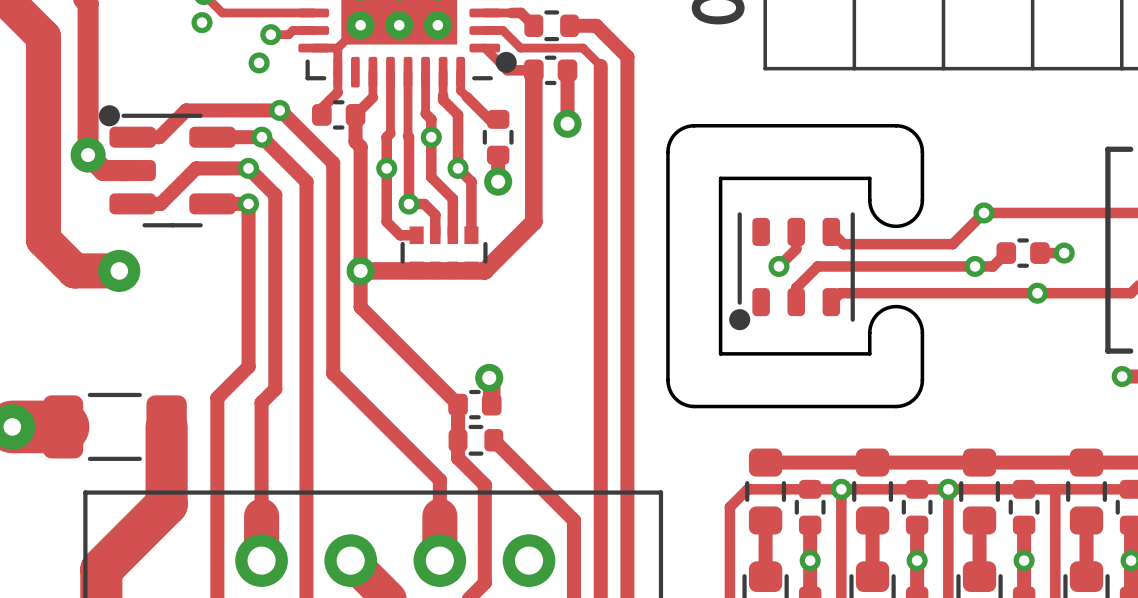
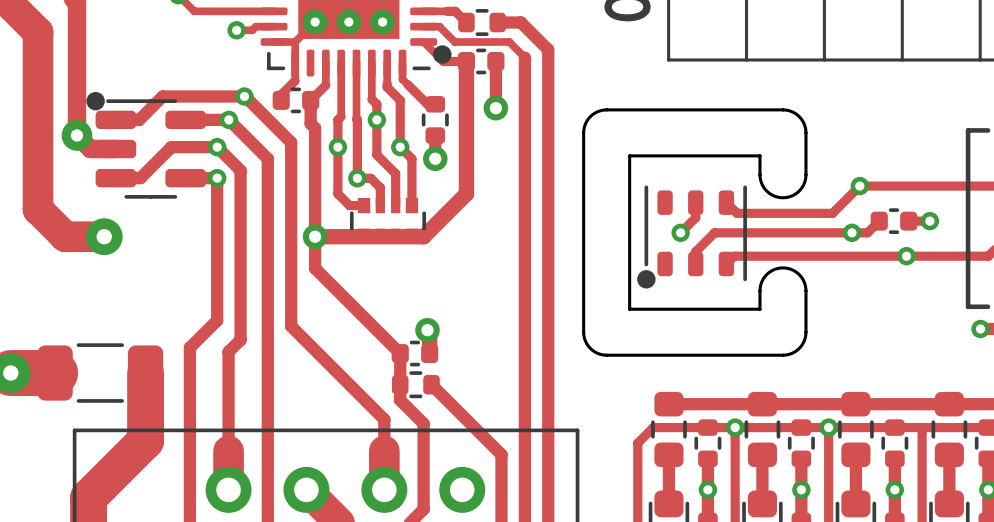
via: (202, 22) -> none
via: (259, 62) -> none

